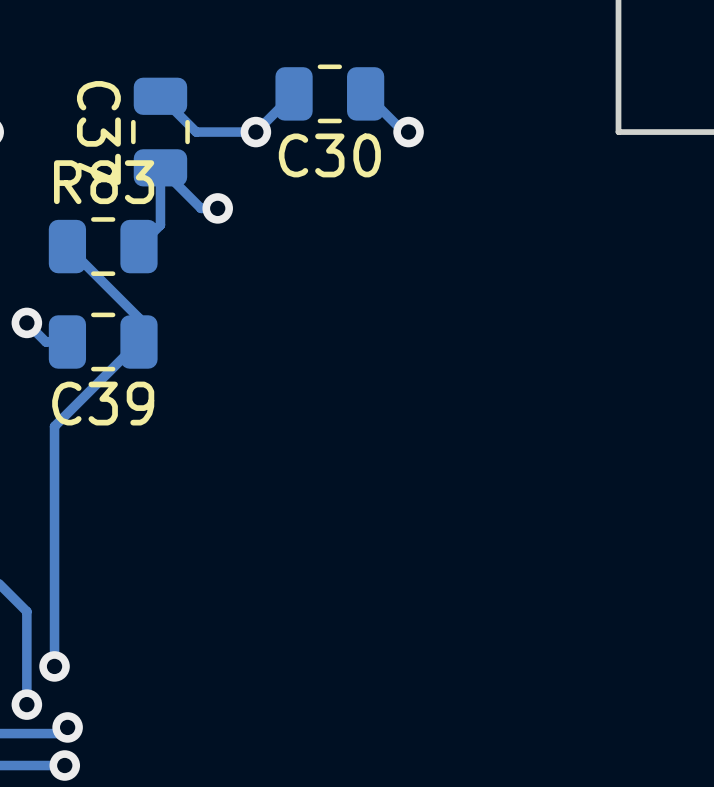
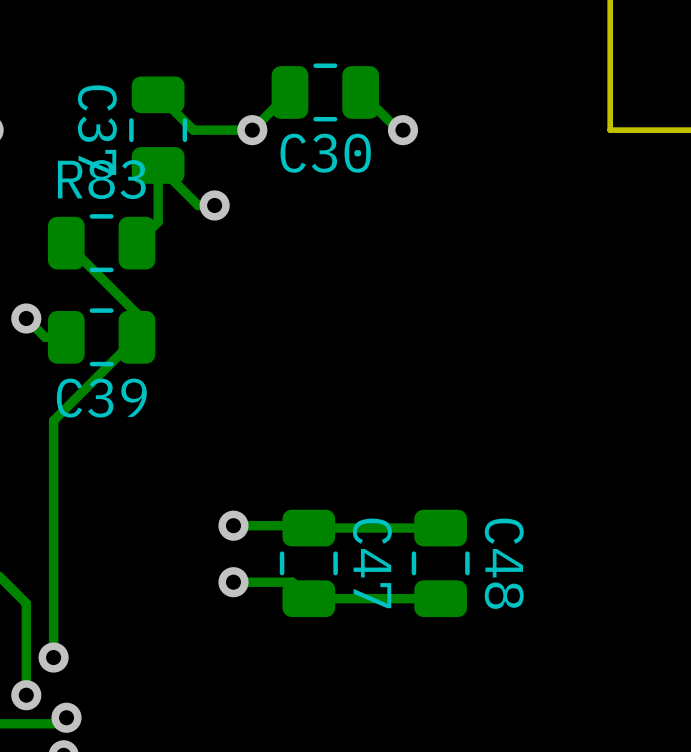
track: none -> (233, 525) (440, 528)
via: none -> (233, 525)
C47: none -> (308, 563)
C48: none -> (440, 563)
track: none -> (233, 582) (292, 582) (308, 598) (440, 598)
via: none -> (233, 582)

